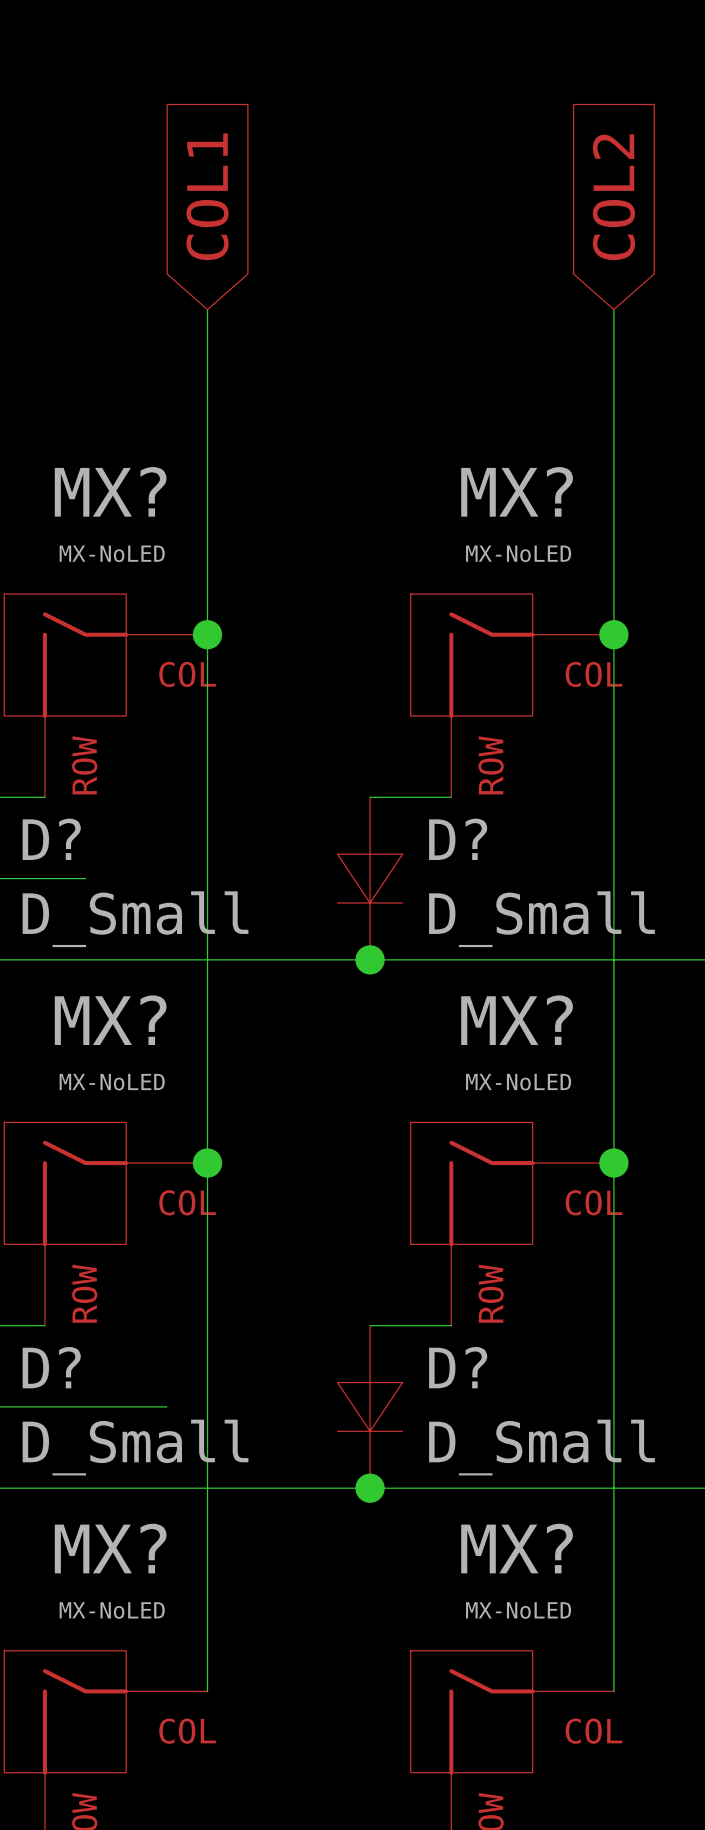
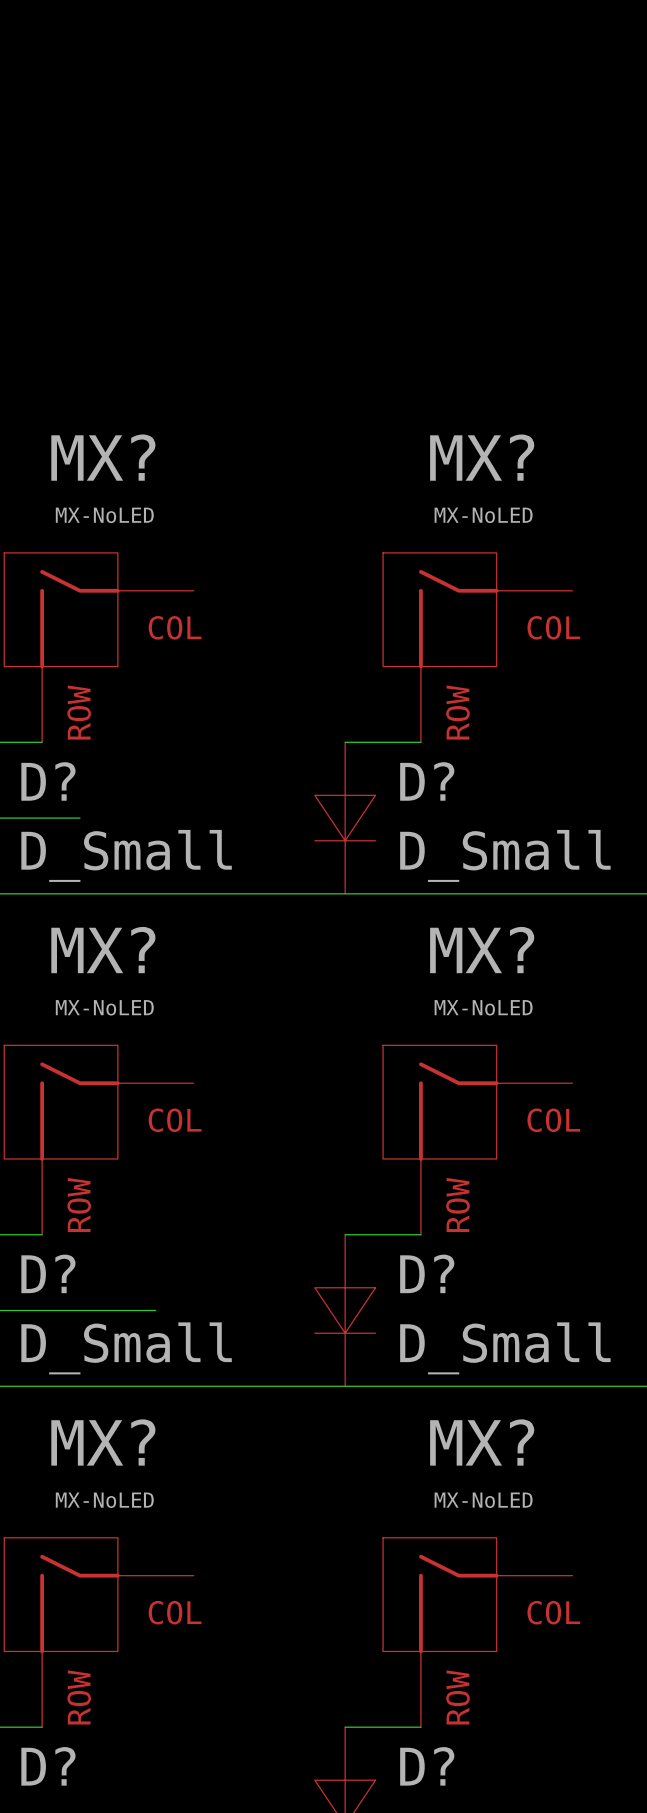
global label: COL1 (207, 196) -> none
global label: COL2 (613, 197) -> none
wire: (207, 309) (207, 1691) -> none
wire: (613, 309) (613, 1691) -> none
junction: (207, 634) -> none
junction: (613, 634) -> none
junction: (370, 959) -> none
junction: (207, 1163) -> none
junction: (613, 1163) -> none
junction: (370, 1488) -> none

